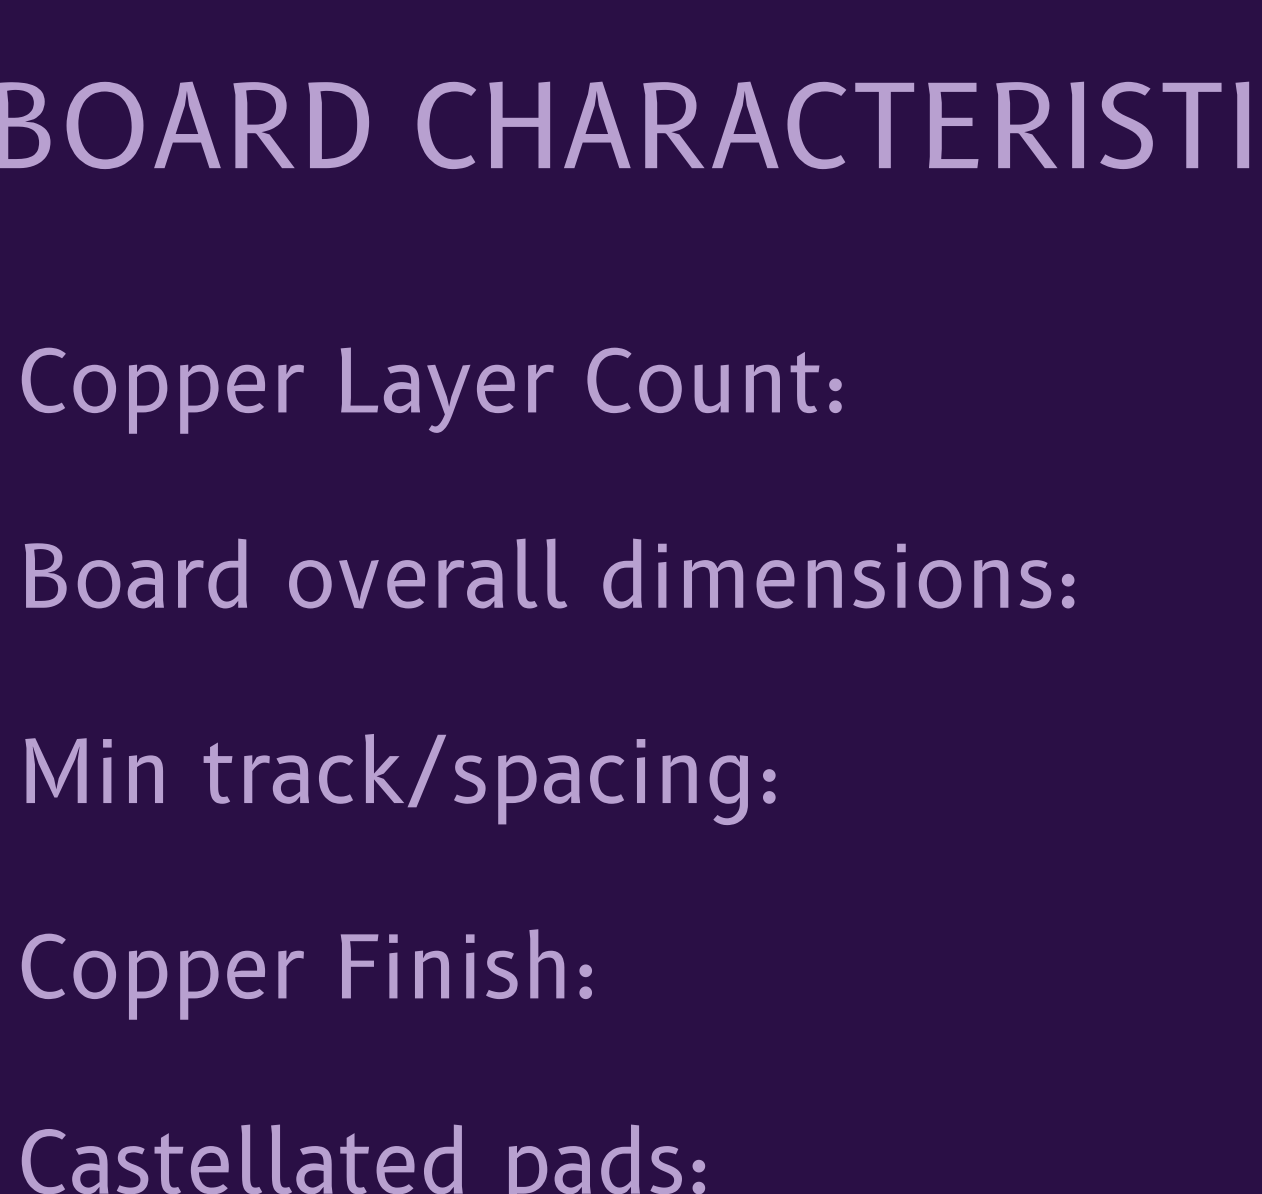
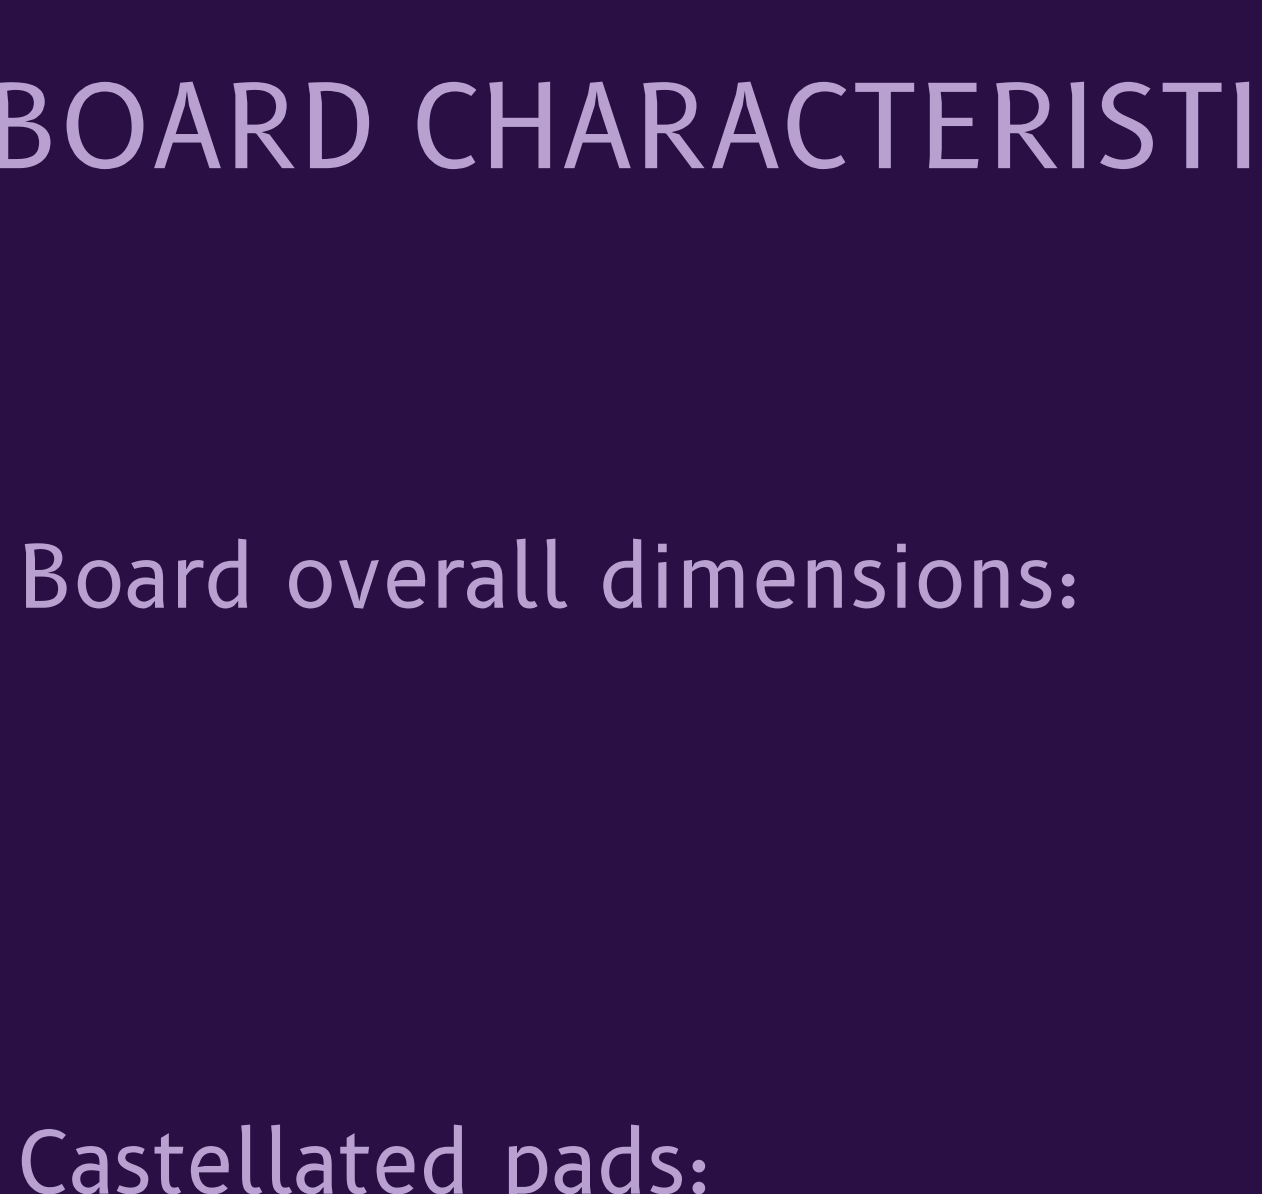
text: Copper Layer Count: (431, 390) -> none
text: Min track/spacing: (400, 779) -> none
text: Copper Finish: (306, 974) -> none

